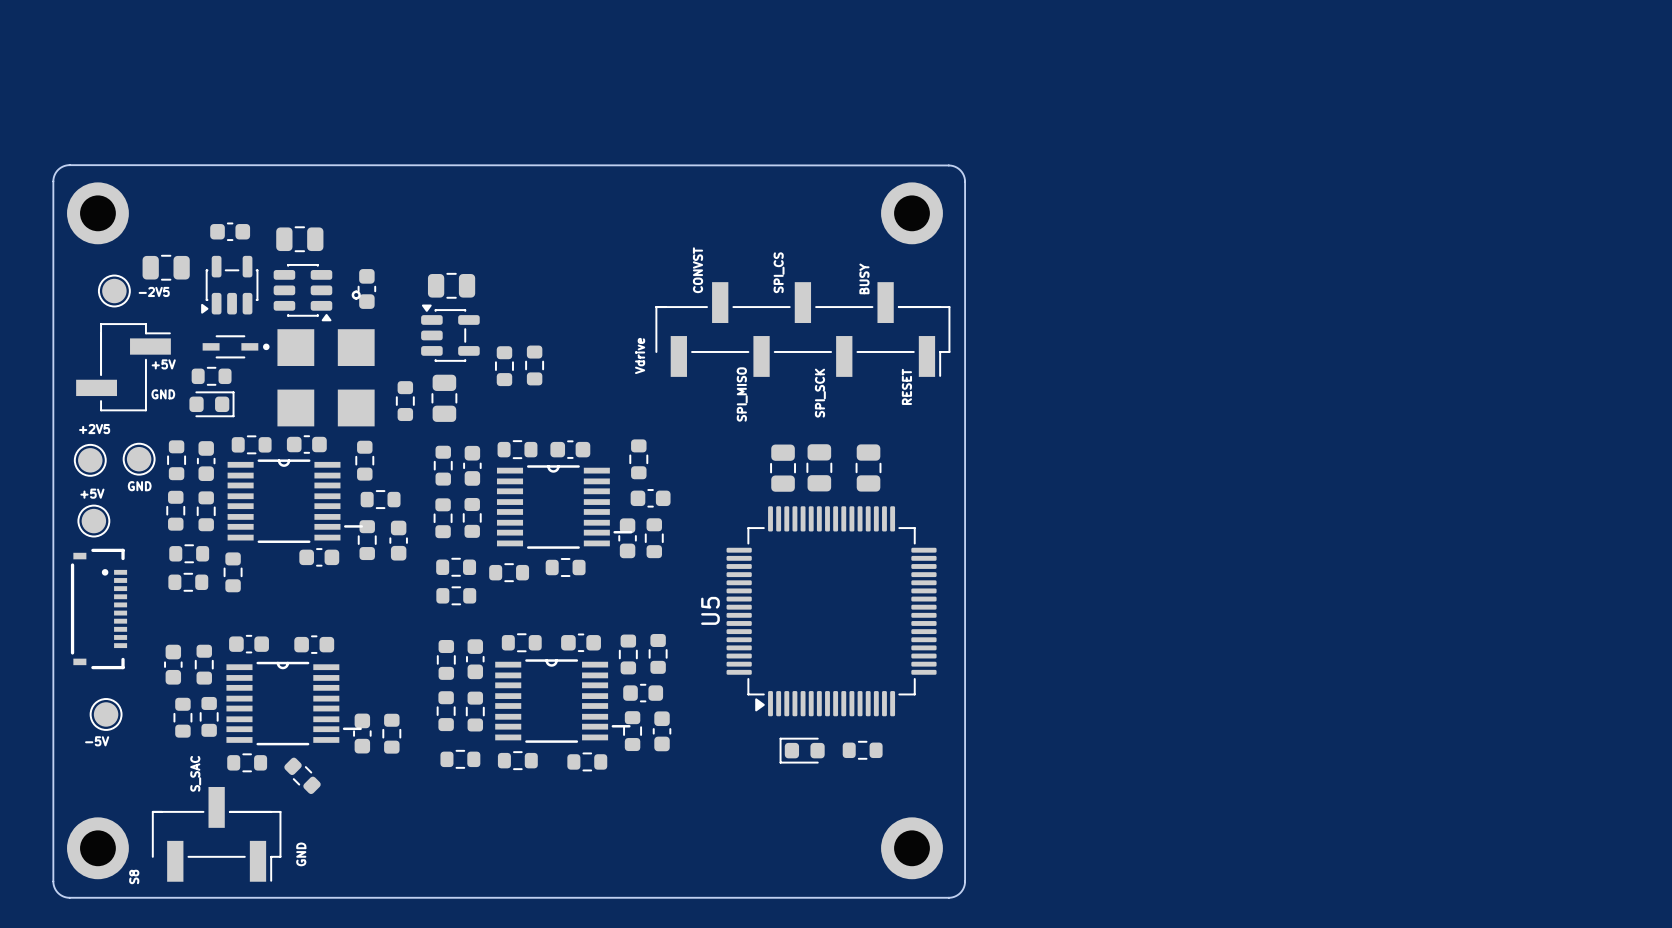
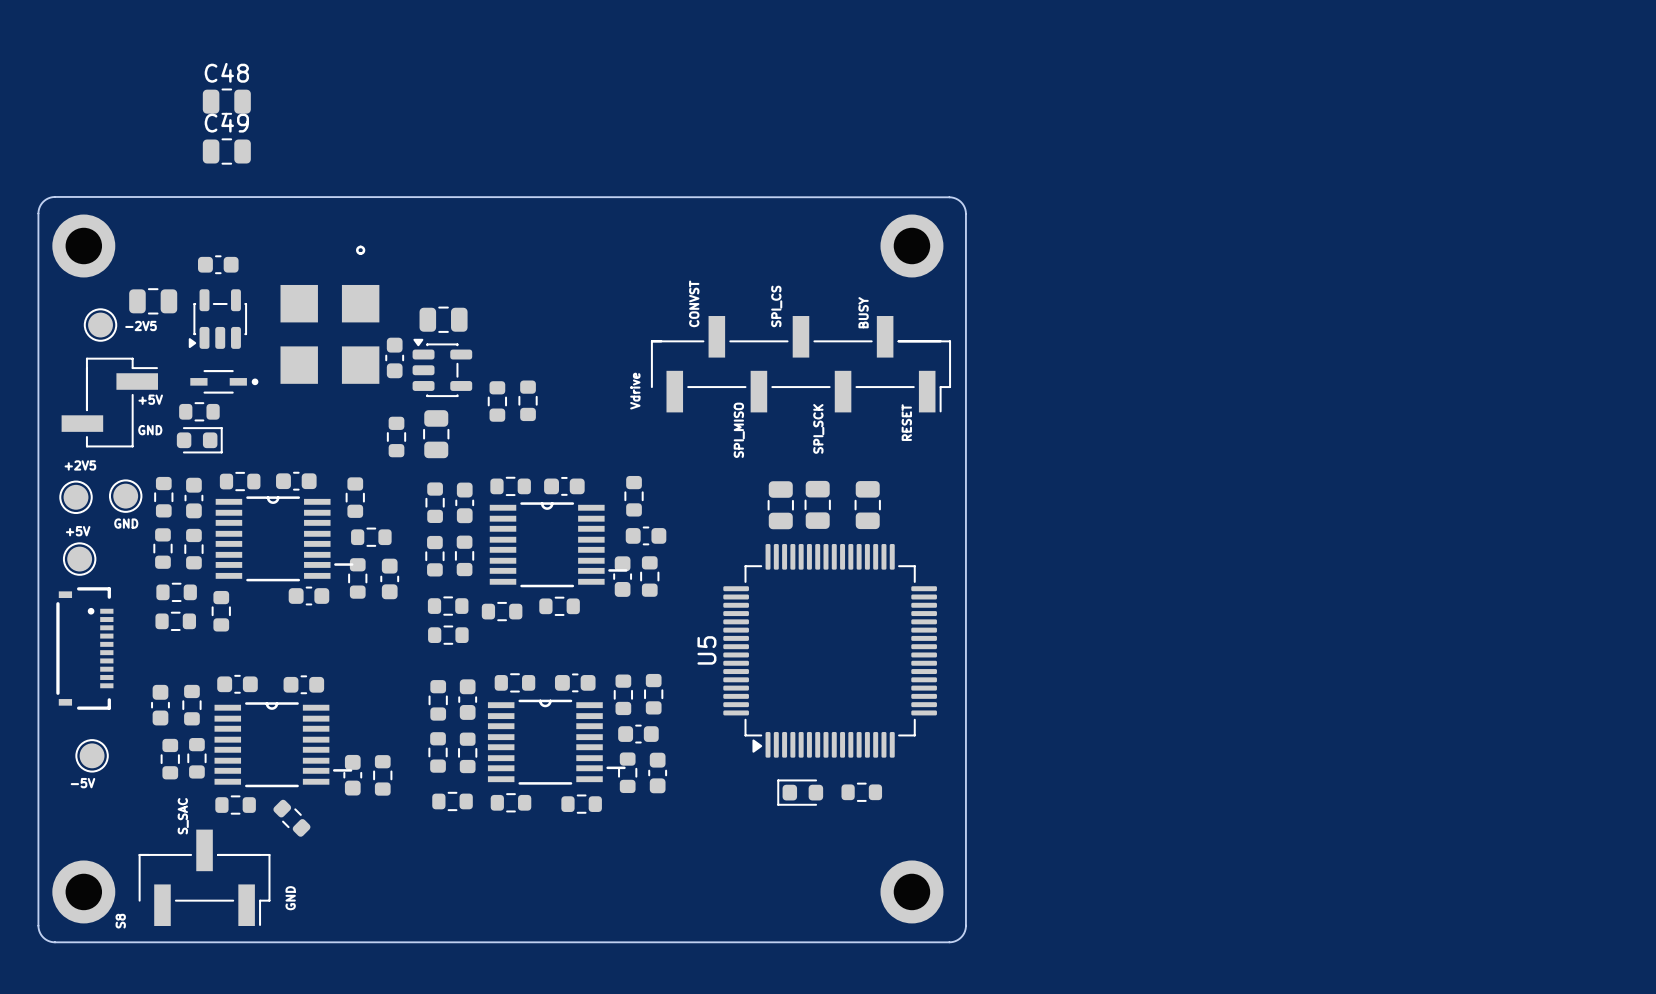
C48: none -> (226, 101)
C49: none -> (226, 151)
part: (299, 239) -> none
part position: (366, 288) -> (394, 357)
part: (302, 292) -> none
part position: (326, 358) -> (329, 314)

